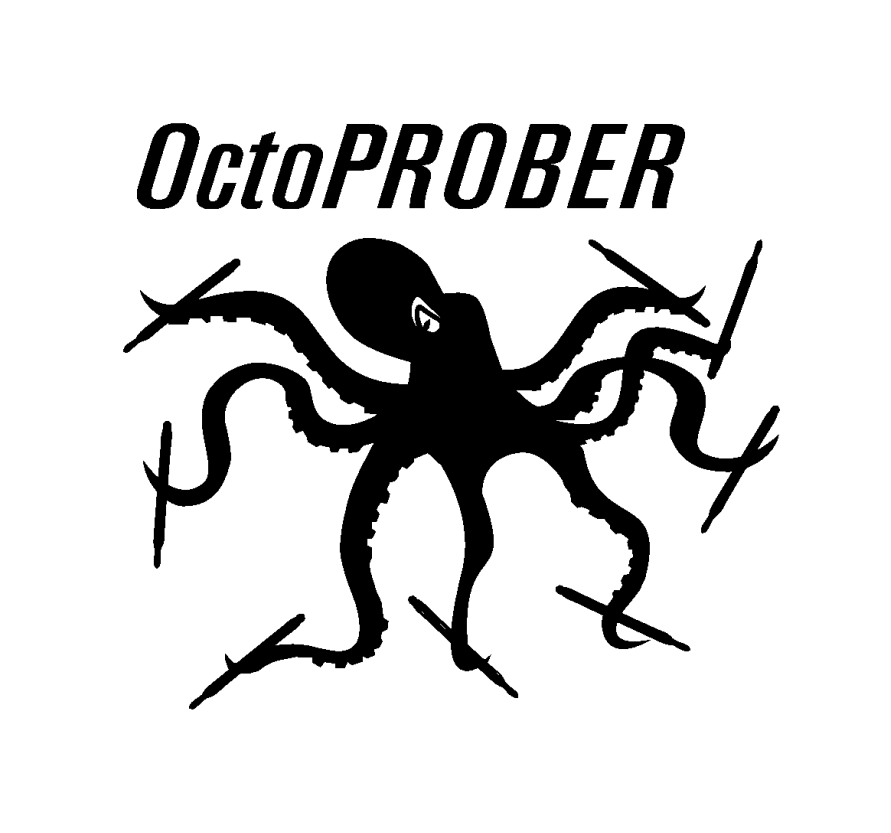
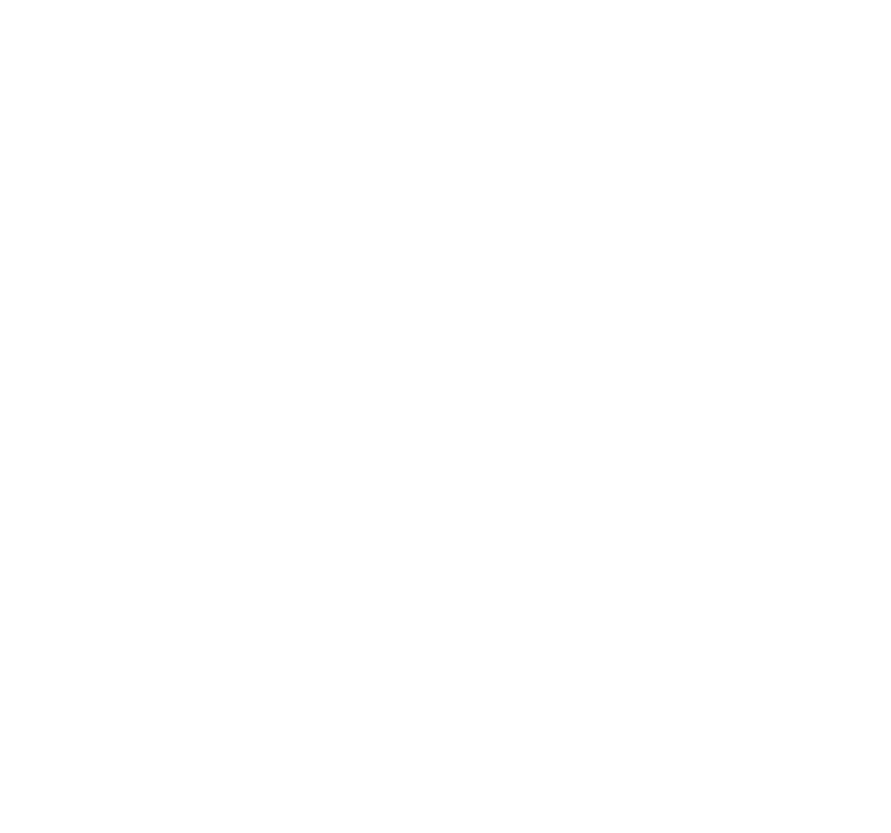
drawing: [123, 123, 780, 710] -> none

